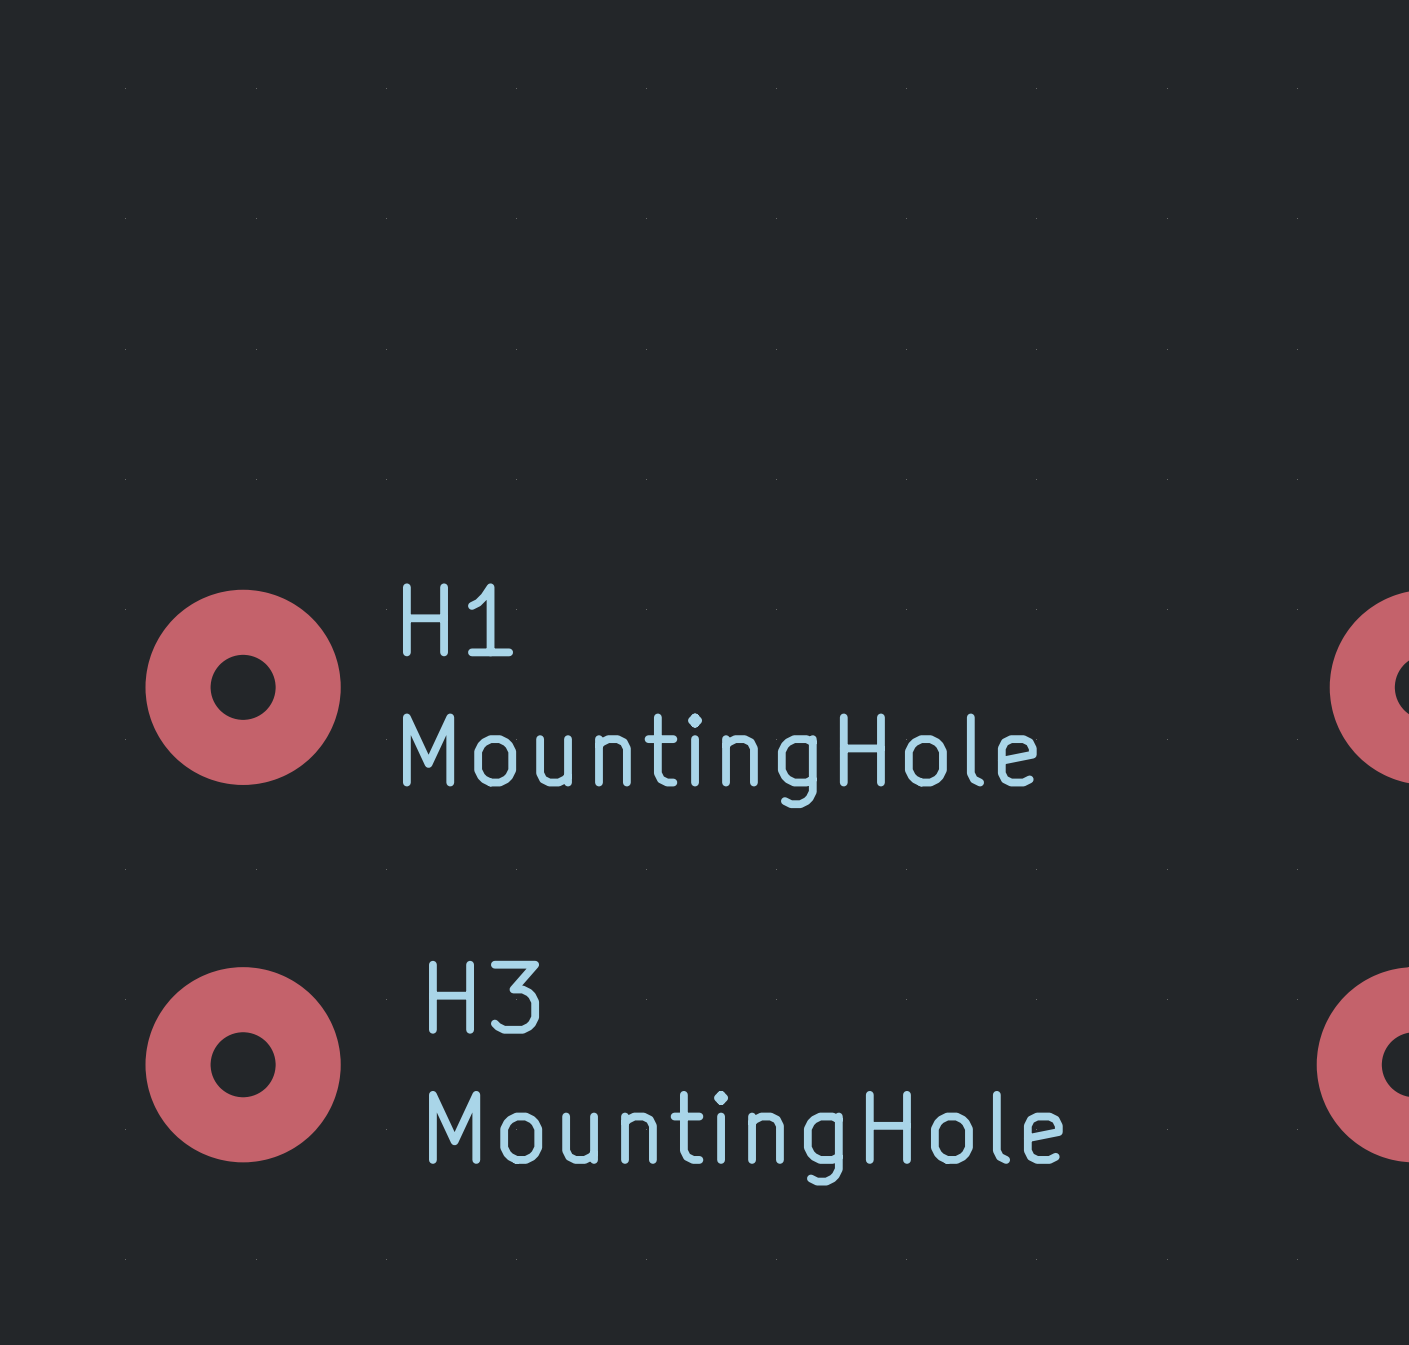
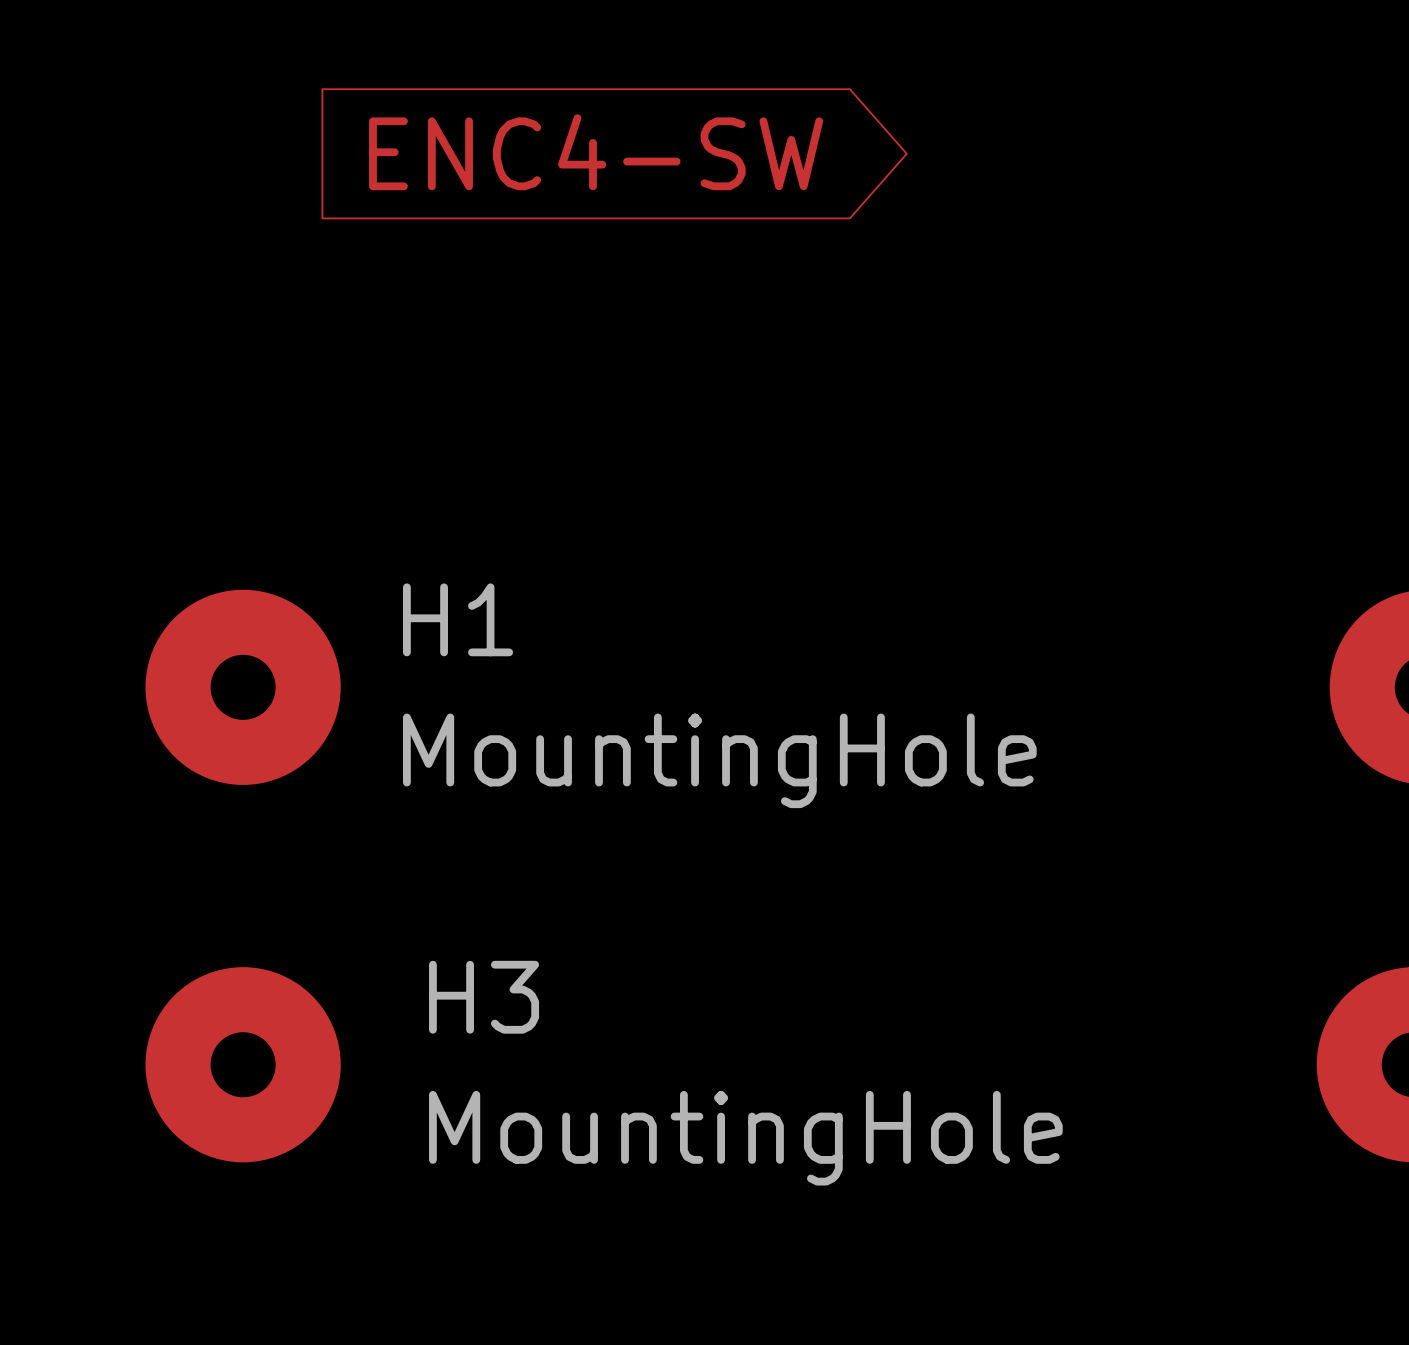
global label: none -> ENC4-SW (596, 152)

